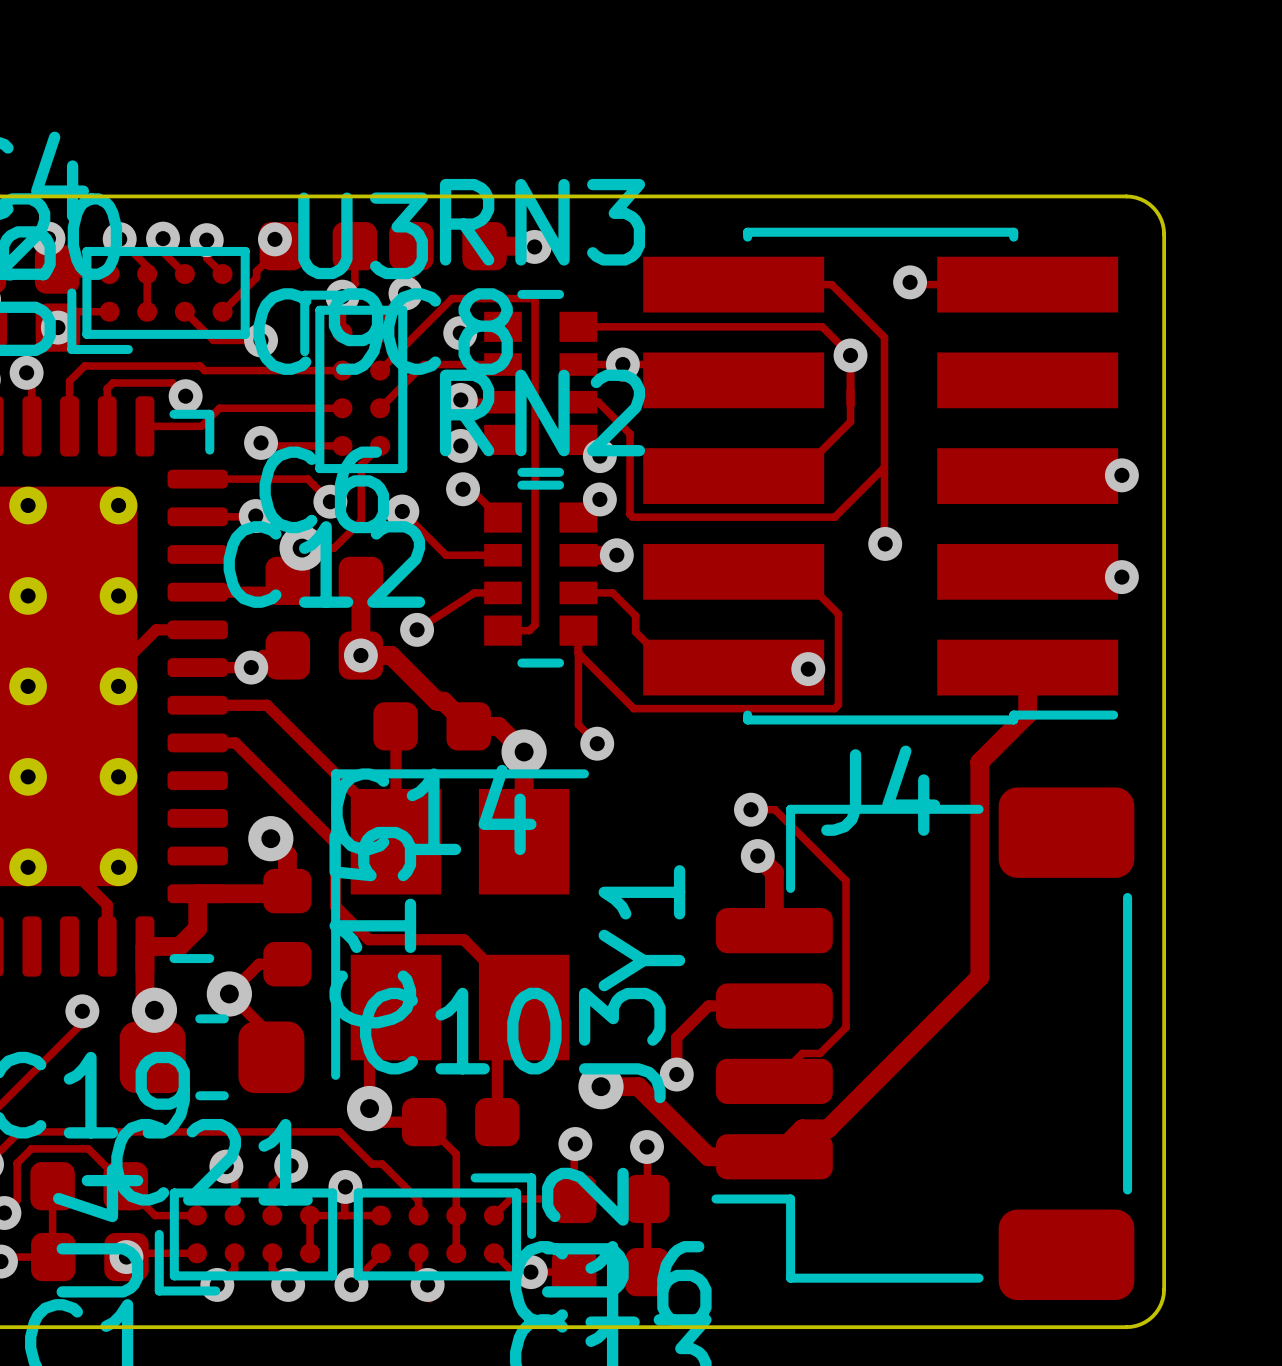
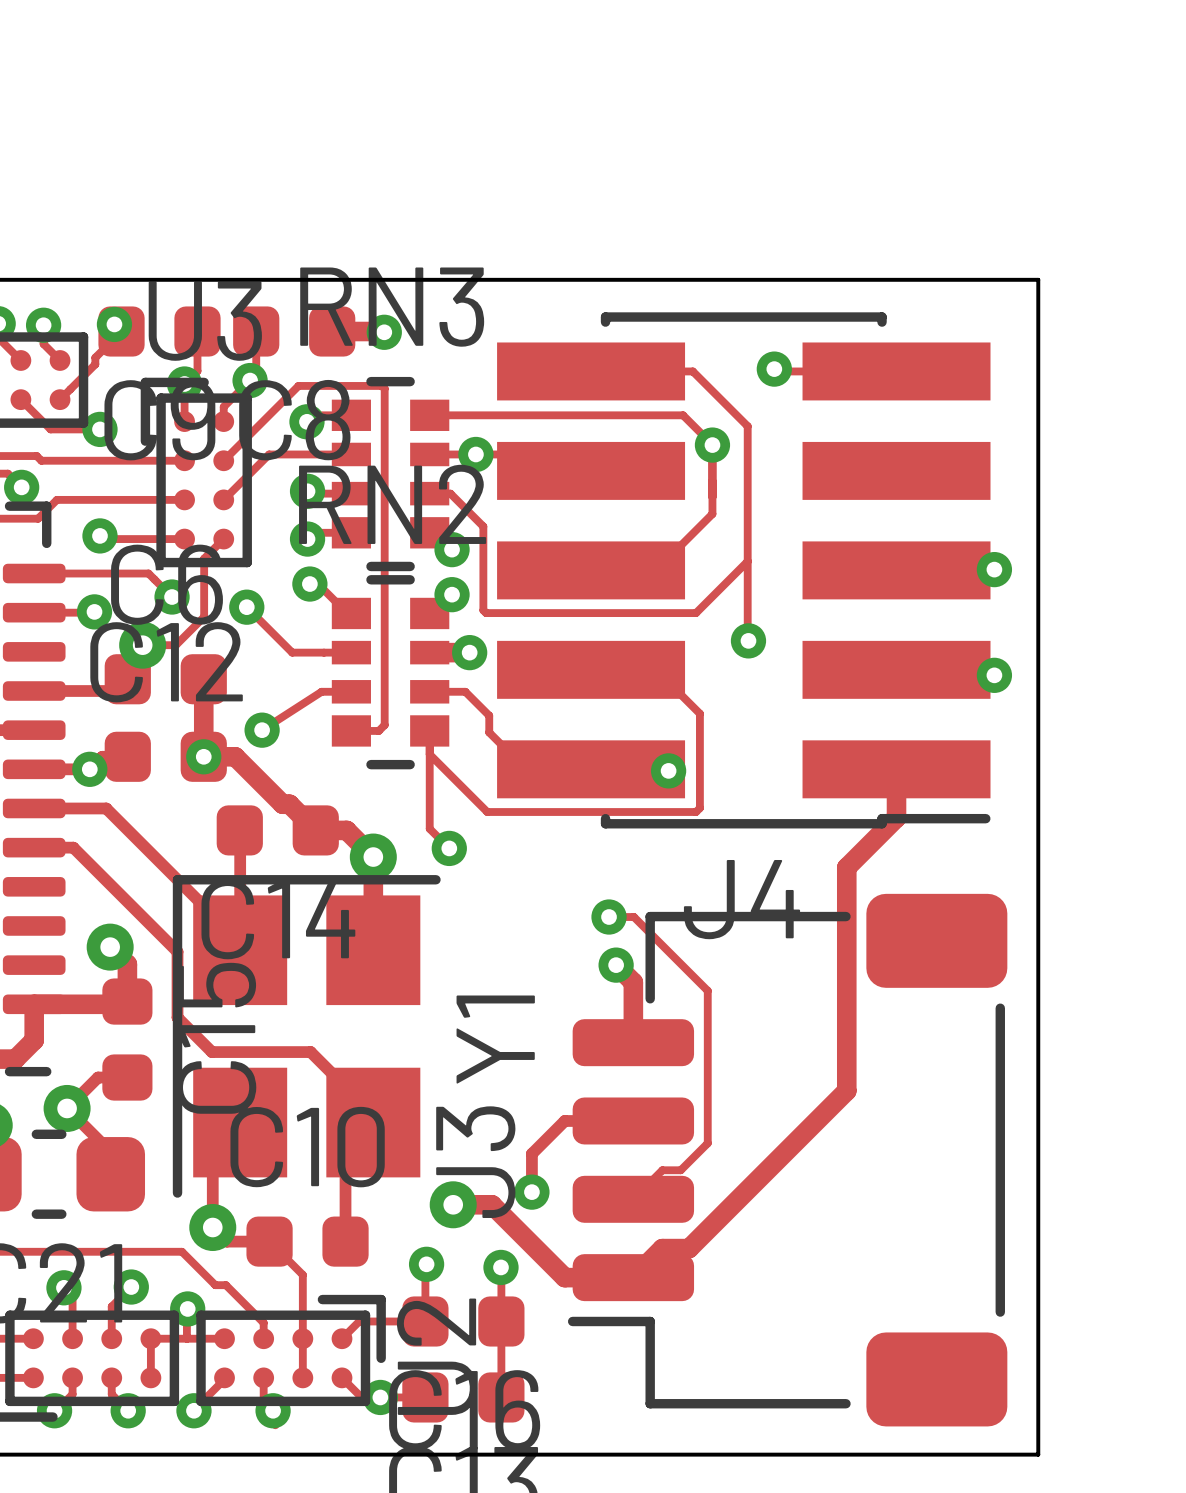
board edge: (1126, 196) (1140, 199) (1153, 207) (1161, 219) (1164, 234) -> (999, 279) (1038, 279) (1038, 318)
board edge: (1164, 1289) (1161, 1303) (1153, 1316) (1140, 1324) (1126, 1327) -> (1038, 1415) (1038, 1454) (999, 1454)

